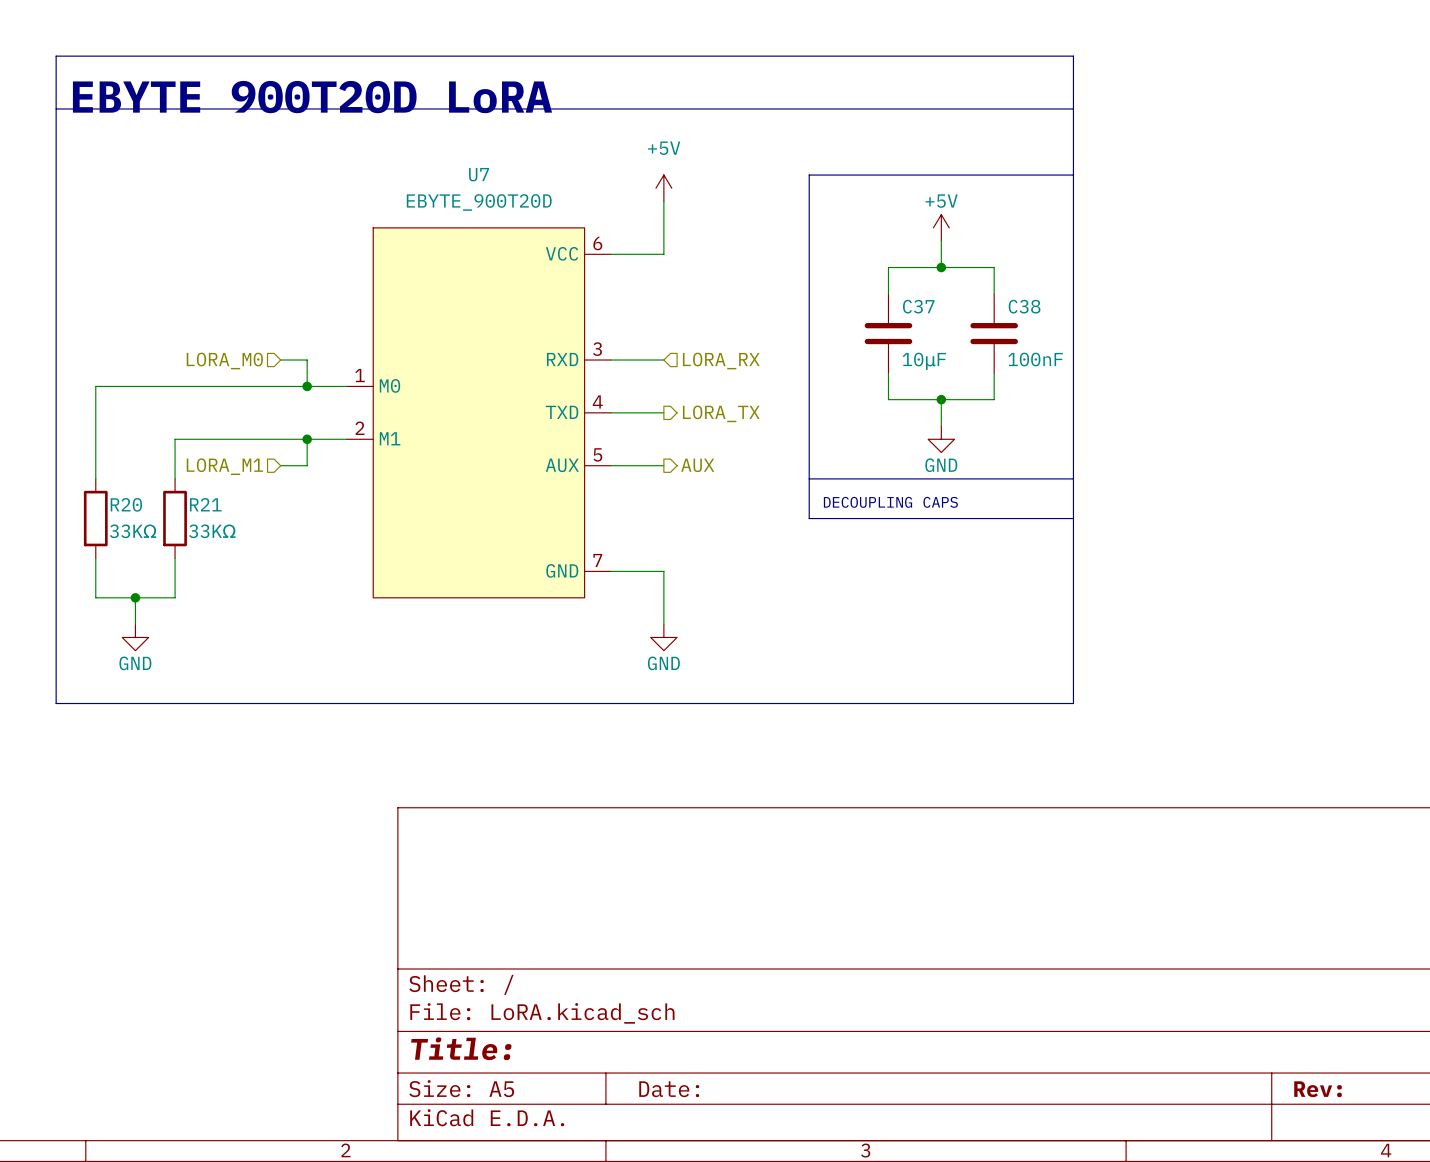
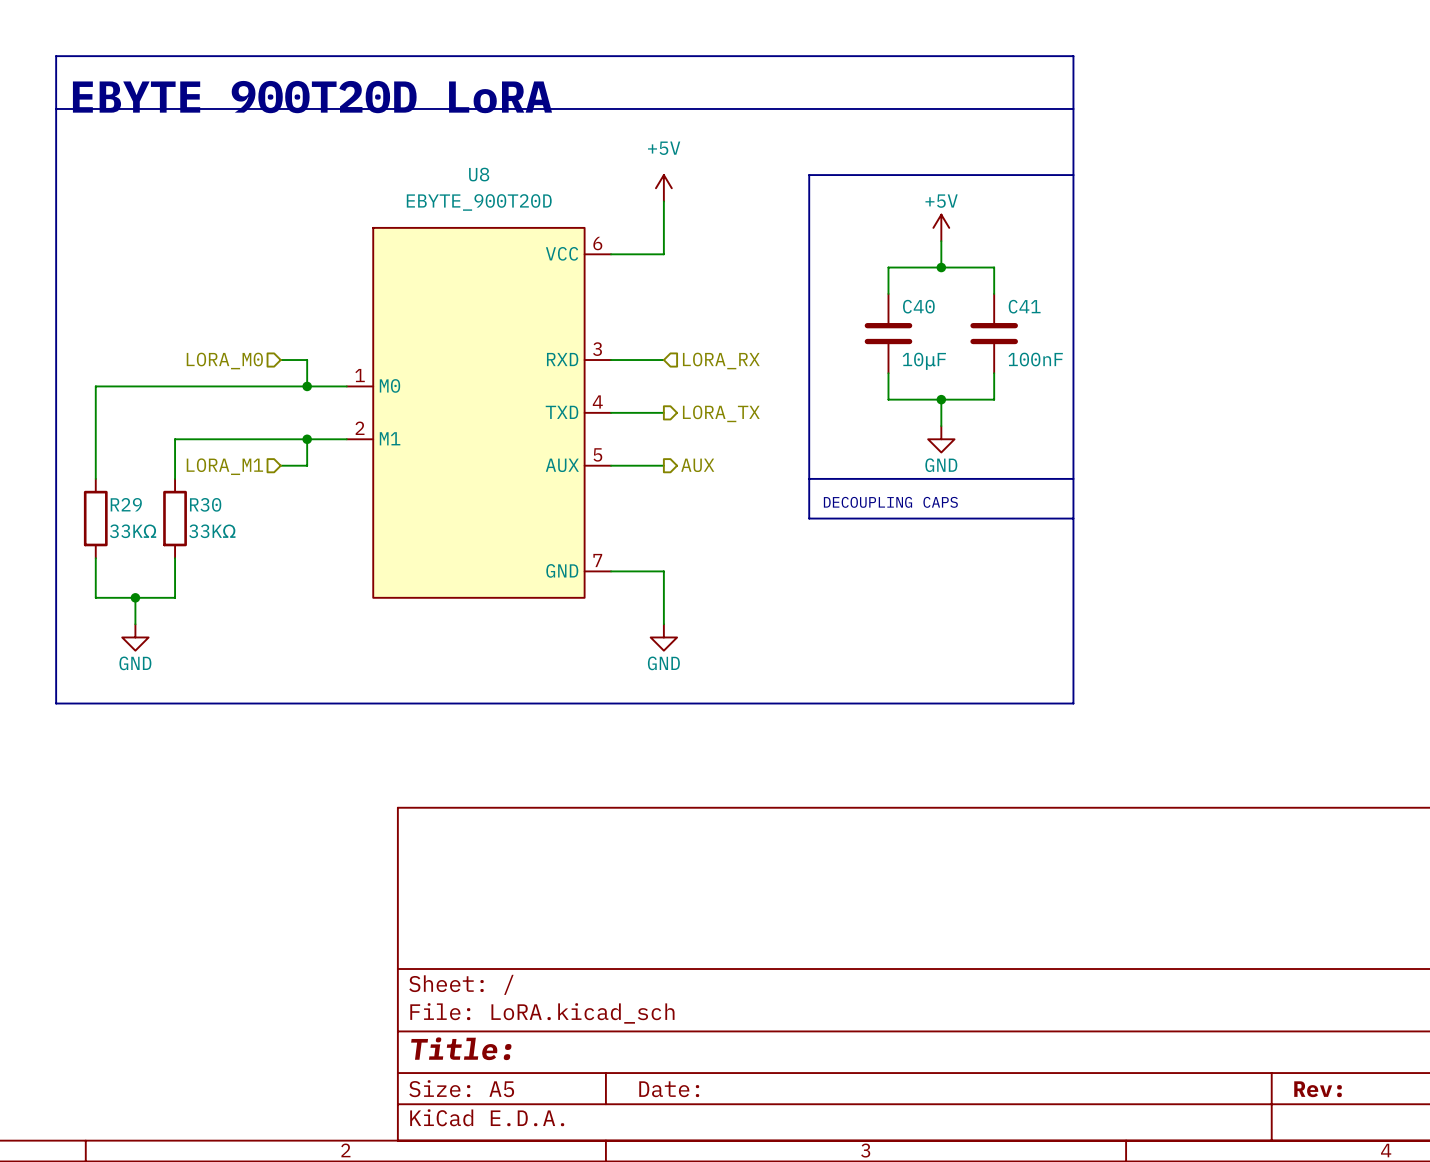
U7 name: U7 (479, 174) -> U8 (479, 174)
C37 name: C37 (918, 306) -> C40 (918, 306)
C38 name: C38 (1024, 306) -> C41 (1024, 306)
R20 name: R20 (126, 504) -> R29 (126, 504)
R21 name: R21 (205, 504) -> R30 (205, 504)

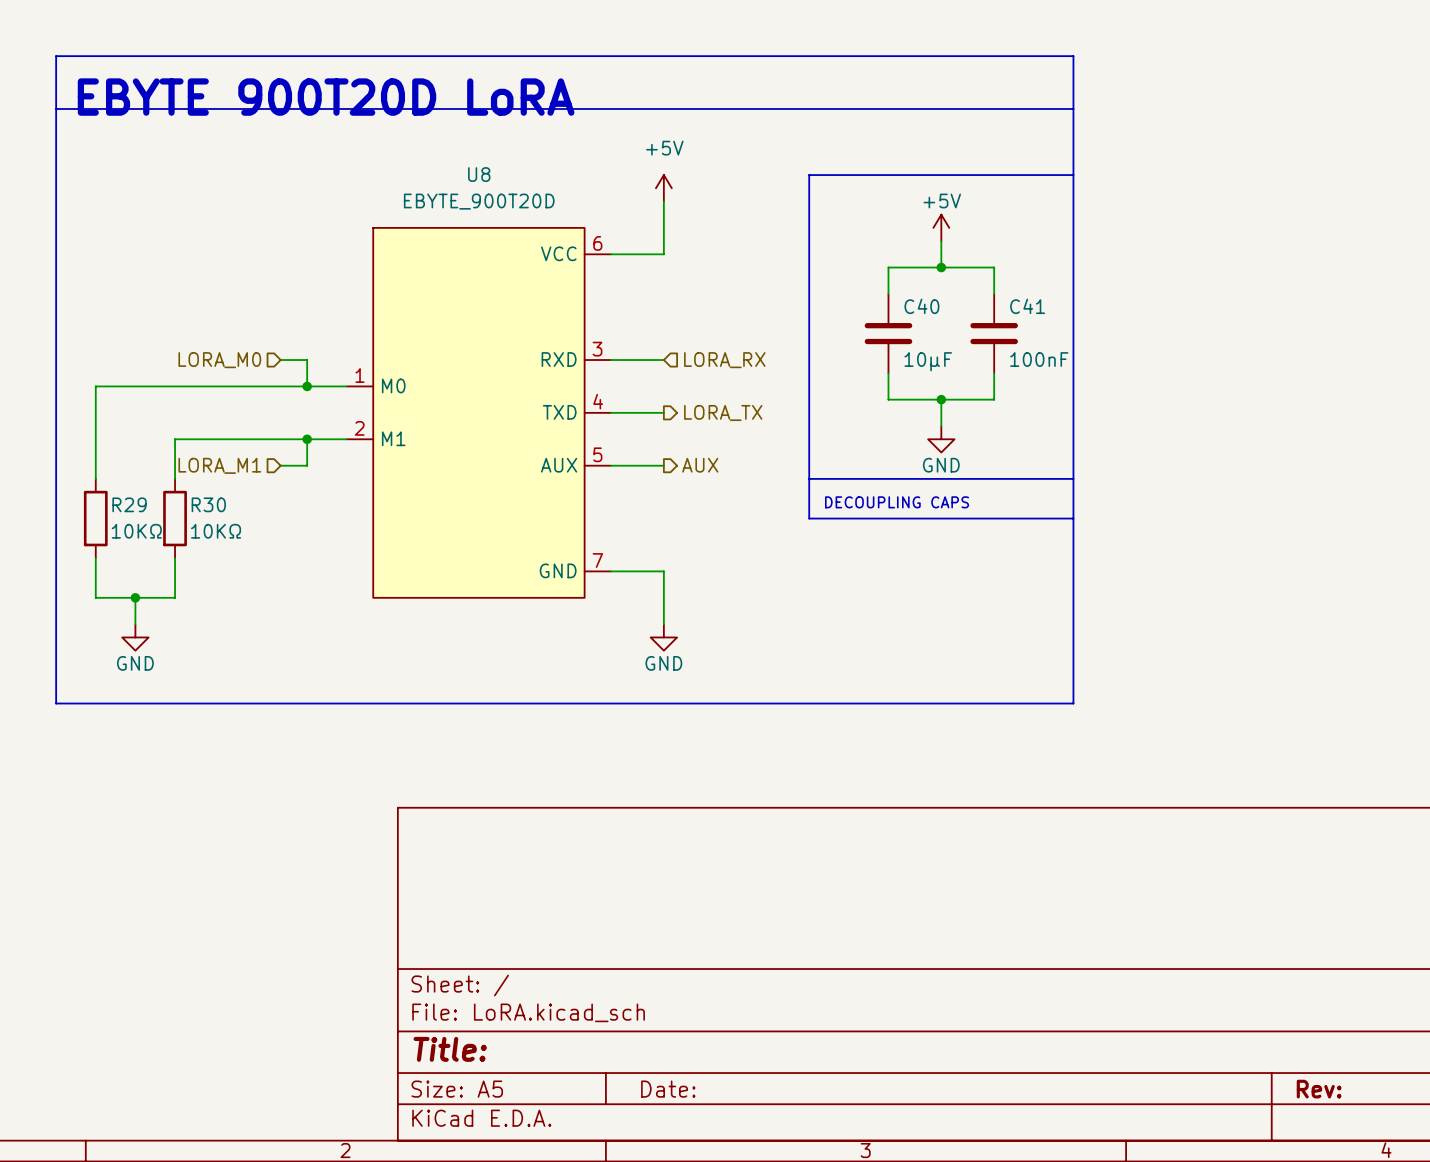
R29 value: 33KΩ (133, 531) -> 10KΩ (136, 531)
R30 value: 33KΩ (212, 531) -> 10KΩ (216, 531)

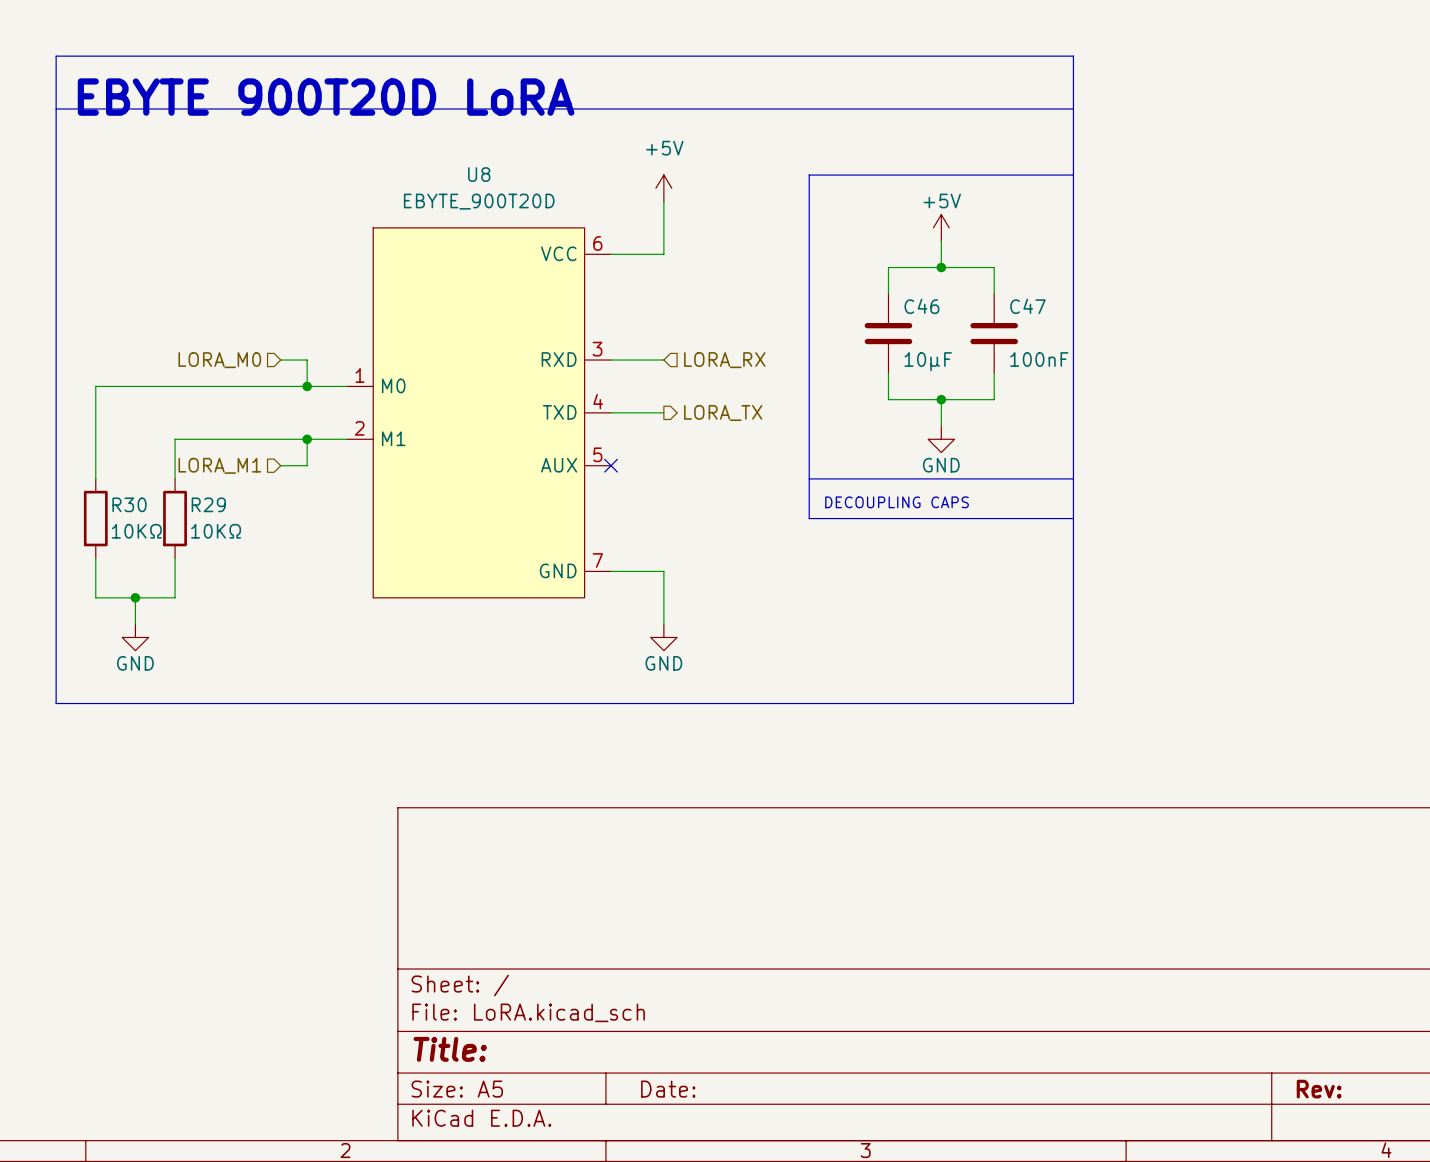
C40 name: C40 (921, 306) -> C46 (921, 306)
C41 name: C41 (1027, 306) -> C47 (1027, 306)
wire: (611, 465) (663, 465) -> none
no-connect mark: none -> (611, 465)
hierarchical label: AUX (700, 465) -> none
R29 name: R29 (129, 504) -> R30 (129, 504)
R30 name: R30 (208, 504) -> R29 (208, 504)

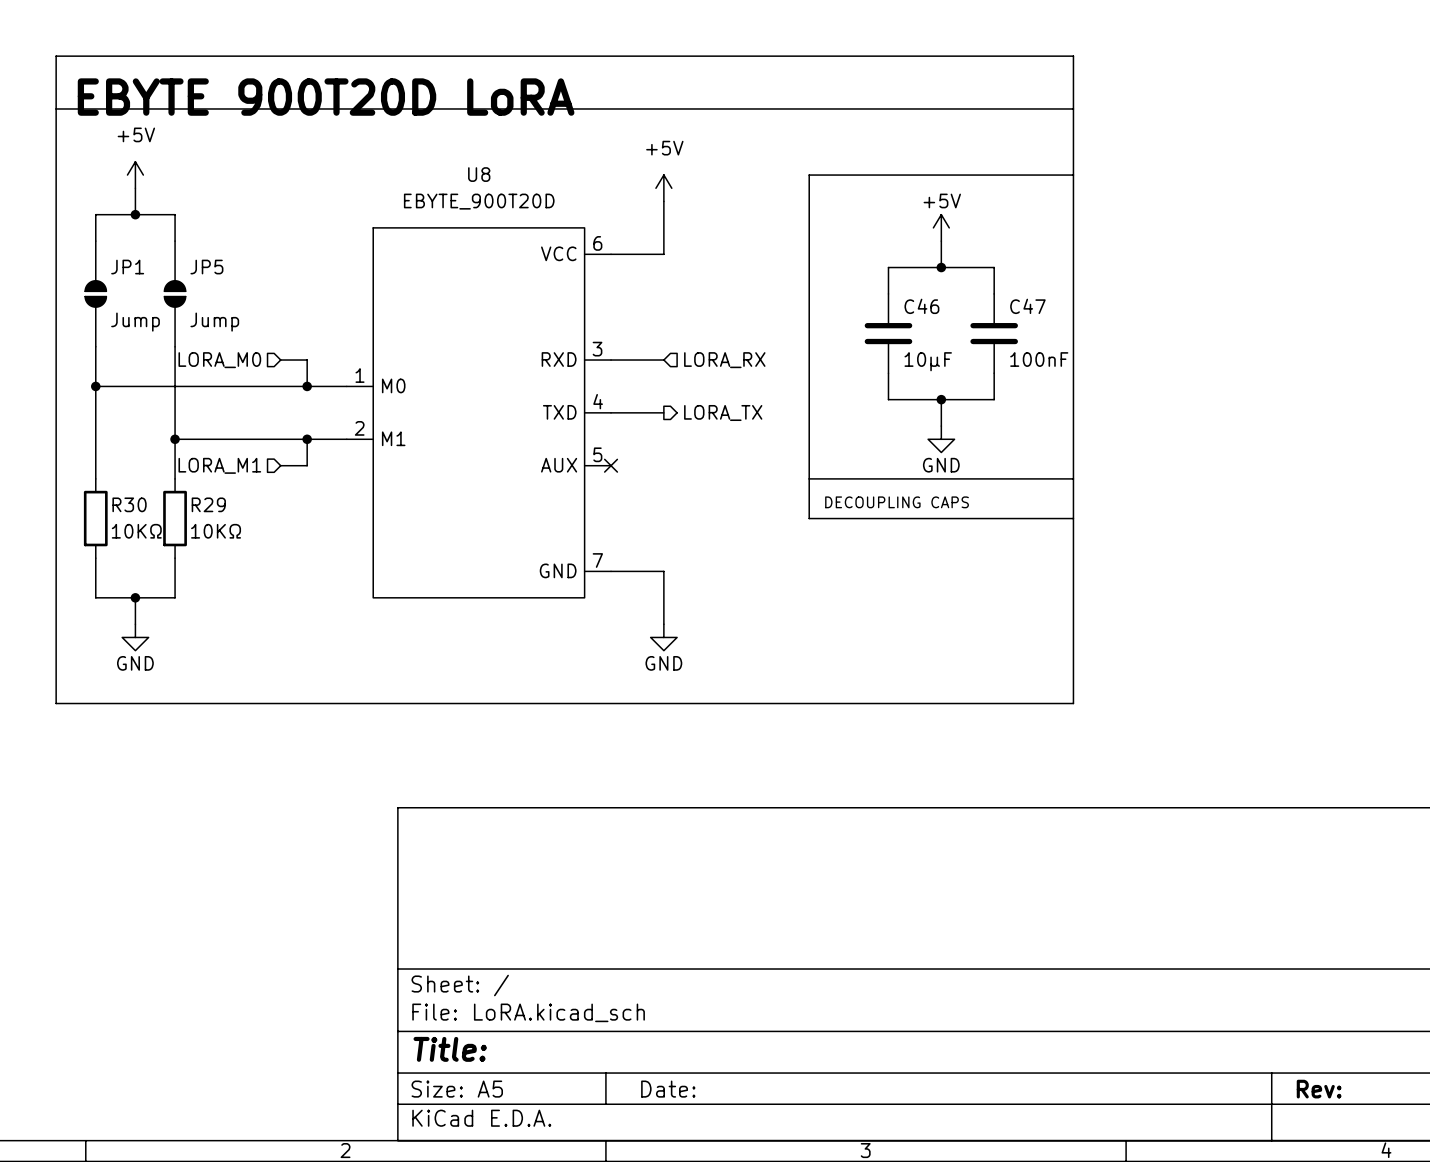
power symbol: none -> +5V (135, 175)
wire: none -> (135, 188) (135, 214)
junction: none -> (135, 214)
wire: none -> (95, 241) (95, 214) (175, 214) (175, 241)
JP1: none -> Jump (95, 293)
JP5: none -> Jump (175, 293)
wire: none -> (95, 346) (95, 386)
wire: none -> (175, 346) (175, 439)
junction: none -> (95, 386)
junction: none -> (175, 439)

